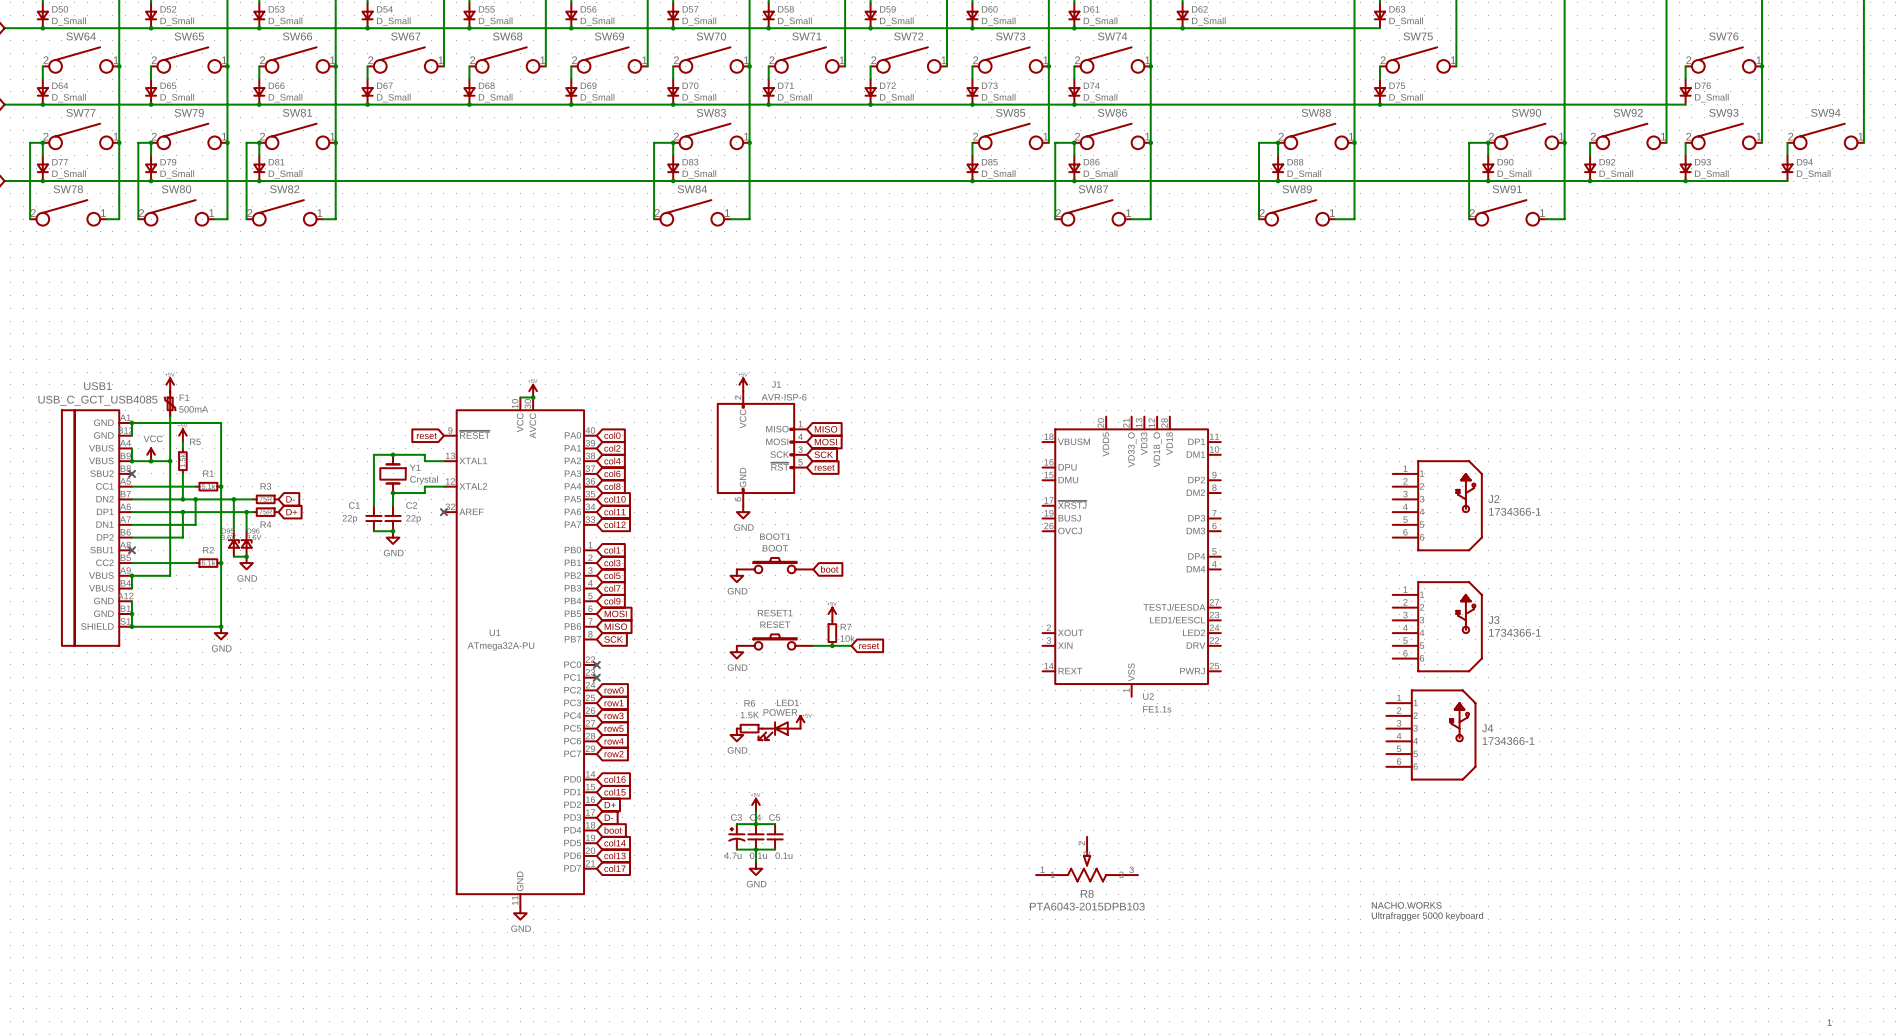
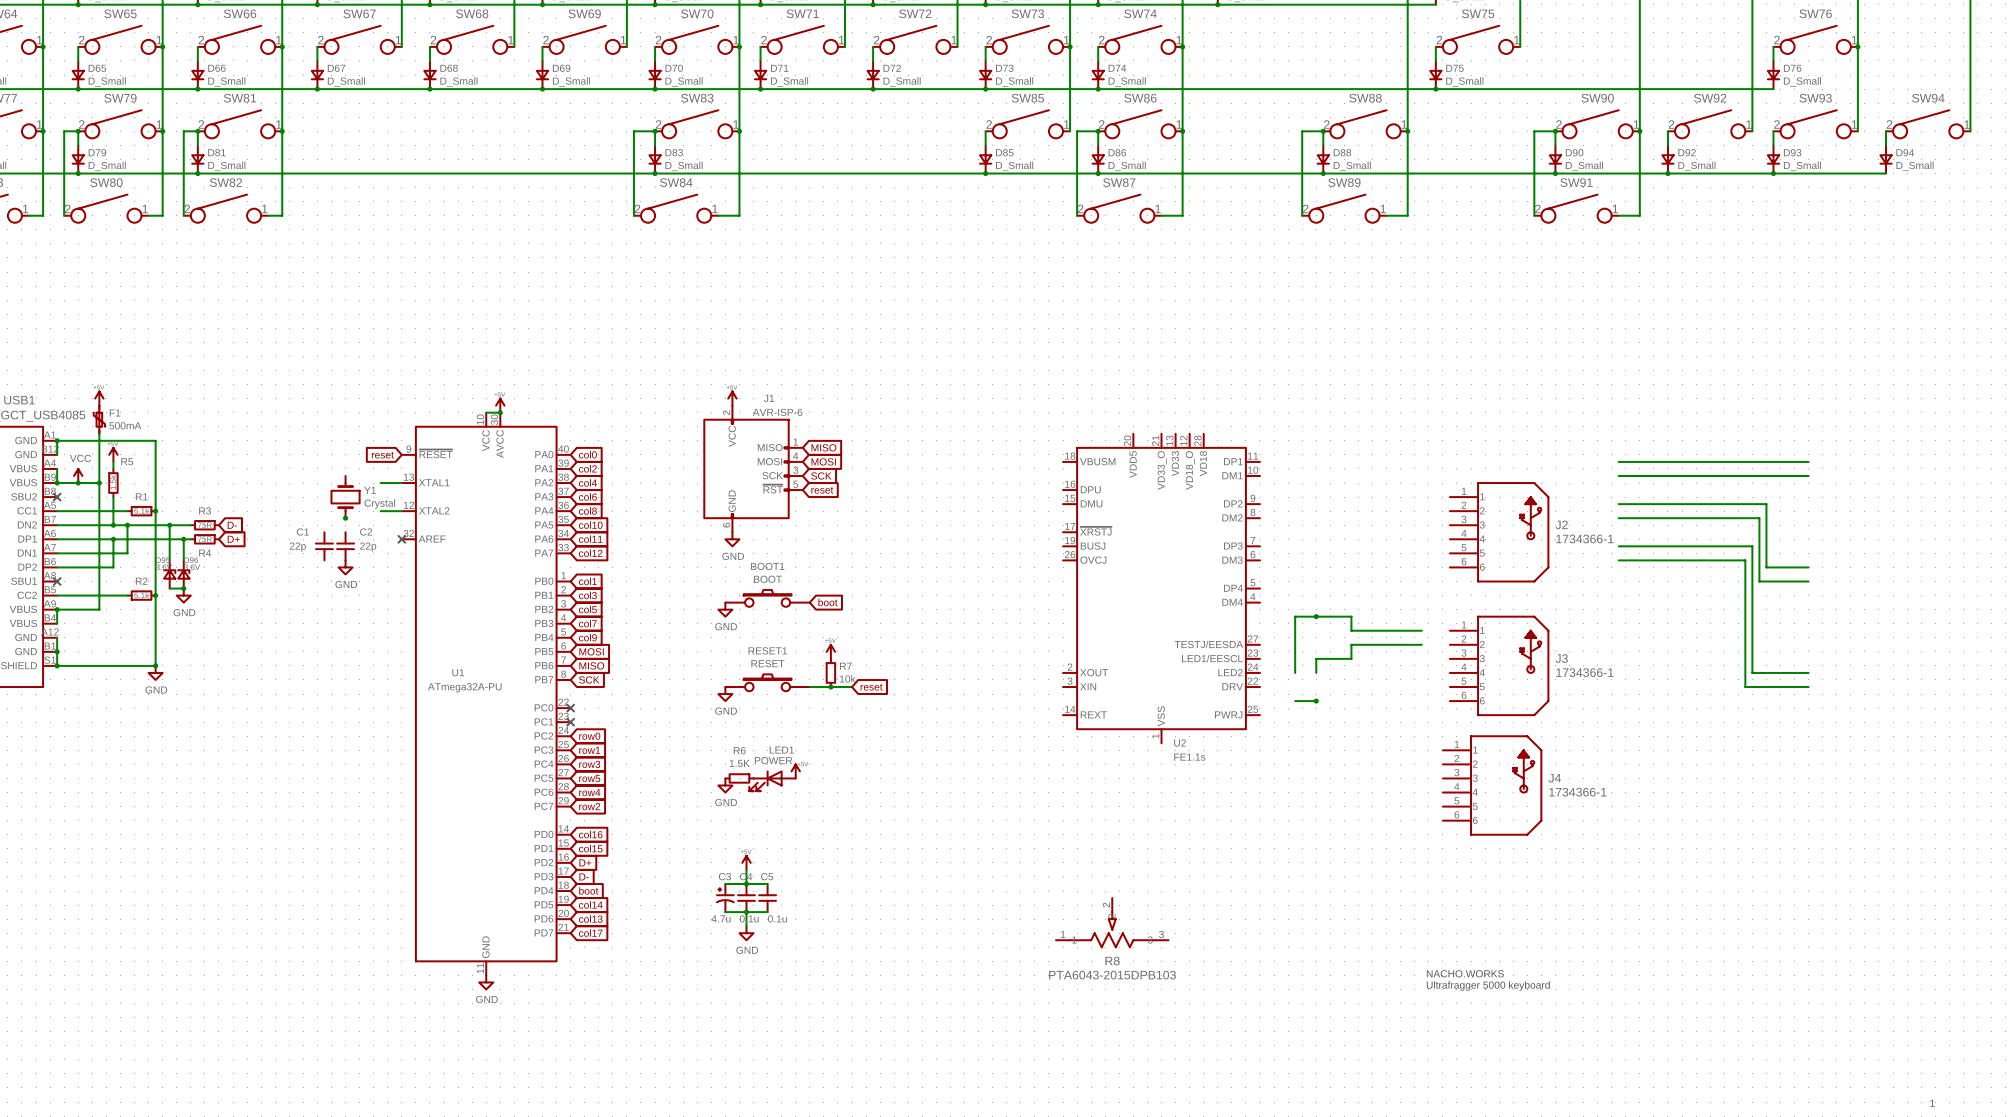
wire: none -> (1618, 461) (1808, 461)
junction: (393, 454) -> none
wire: none -> (1618, 475) (1808, 475)
wire: (424, 461) (424, 454) (373, 454) (373, 505) -> none
wire: none -> (1618, 504) (1766, 504) (1766, 567) (1808, 567)
wire: (424, 486) (424, 493) (393, 493) (393, 505) -> none
wire: none -> (1618, 518) (1759, 518) (1759, 581) (1808, 581)
wire: none -> (1618, 546) (1752, 546) (1752, 672) (1808, 672)
wire: (373, 531) (393, 531) -> none
junction: (393, 531) -> none
wire: none -> (1618, 560) (1745, 560) (1745, 687) (1808, 687)
junction: none -> (1316, 616)
wire: none -> (1421, 630) (1351, 630) (1351, 616) (1295, 616) (1295, 672)
wire: none -> (1421, 644) (1351, 644) (1351, 658) (1316, 658) (1316, 672)
wire: none -> (1295, 701) (1316, 701)
junction: none -> (1316, 701)

